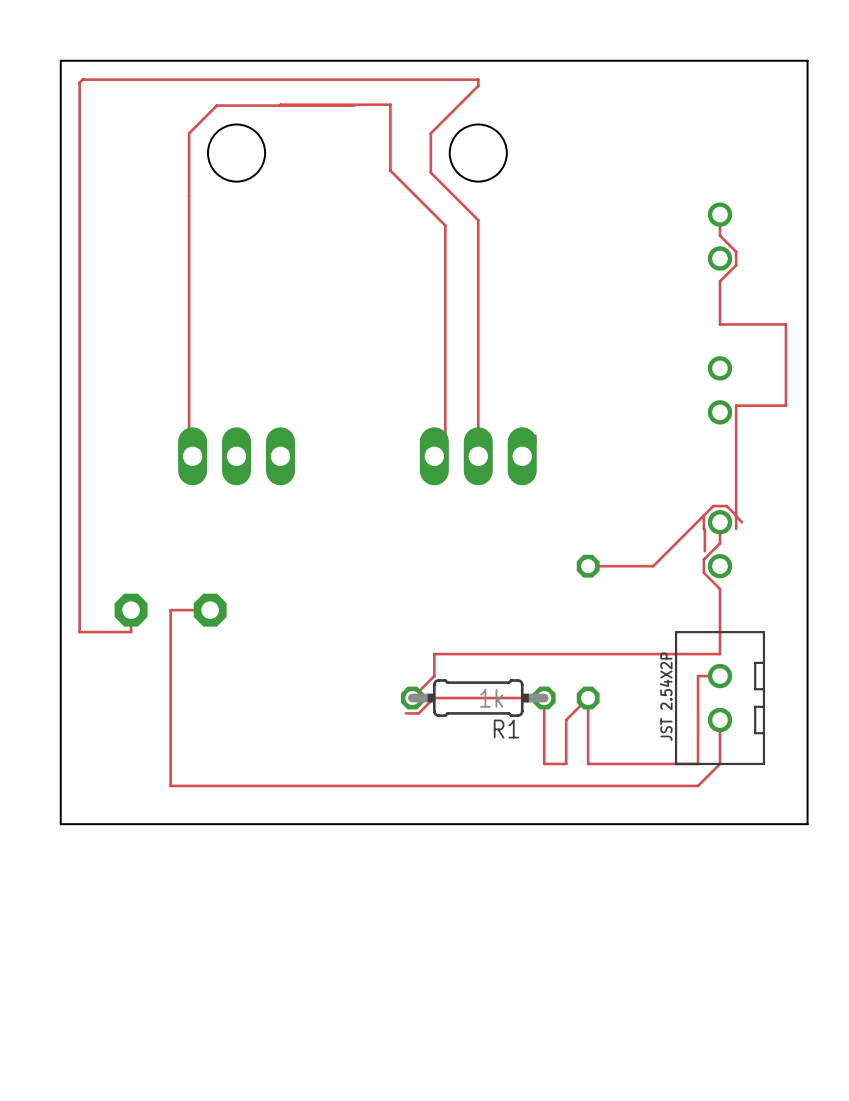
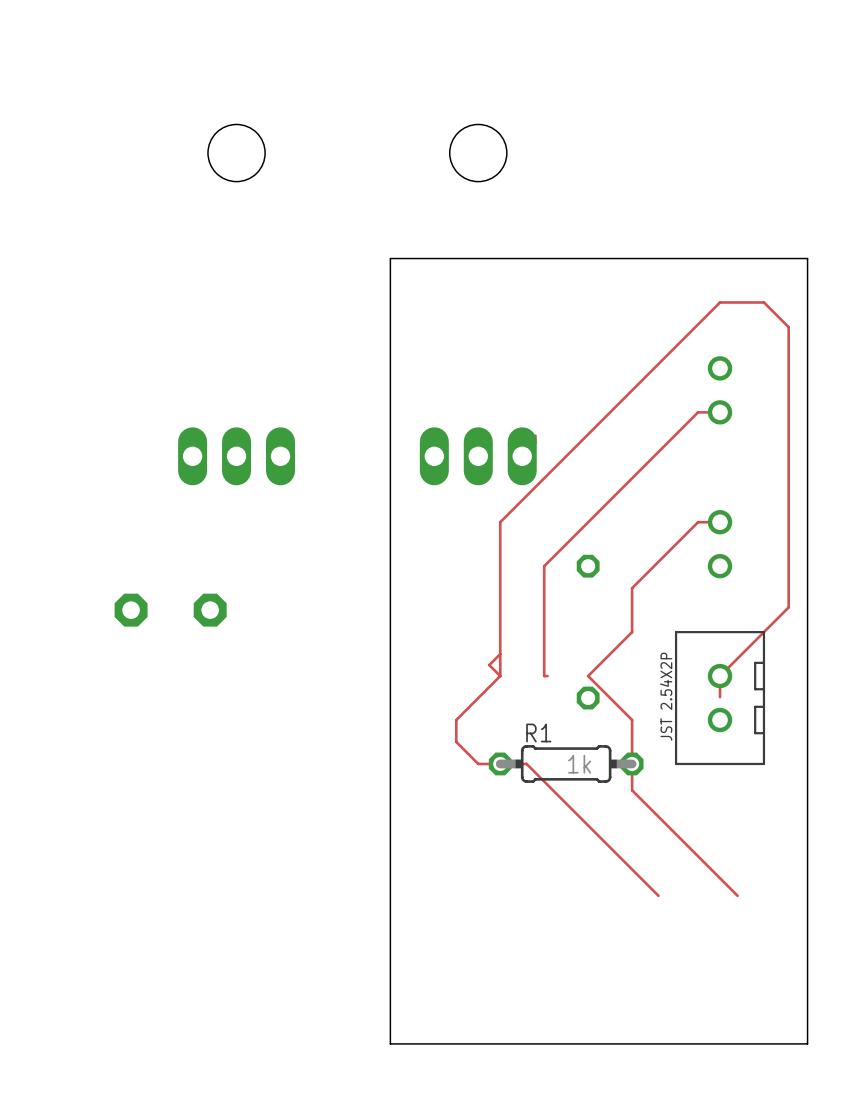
top track: (279, 105) (390, 104) (390, 170) (445, 225) (445, 445) (434, 456) -> none
top track: (354, 105) (216, 105) (189, 133) (189, 456) -> none
top track: (720, 214) (720, 235) (736, 251) (736, 265) (720, 281) (720, 324) (785, 324) (785, 405) (736, 405) (736, 528) -> none
part: (720, 236) -> none
board edge: (807, 258) (807, 60) (60, 60) (60, 824) (807, 824) -> (807, 258) (390, 258) (390, 1043) (807, 1043) (807, 824)
top track: none -> (720, 412) (698, 412) (544, 566) (544, 676) (547, 676)
top track: (478, 456) (478, 220) (430, 172) (430, 133) (478, 85) (478, 79) (82, 79) (79, 82) (79, 632) (131, 632) (131, 610) -> none
top track: (703, 515) (704, 551) -> none
top track: (736, 515) (726, 506) (713, 506) (653, 566) (588, 566) -> none
top track: (736, 516) (741, 522) -> none
top track: (720, 522) (720, 543) (703, 559) (703, 572) (720, 589) (720, 654) (434, 654) (434, 676) (412, 698) -> (720, 522) (698, 522) (632, 588) (632, 632) (588, 676) (632, 720) (632, 790) (737, 895)
top track: (210, 610) (170, 610) (170, 785) (698, 785) (720, 763) (720, 720) -> none
top track: none -> (500, 654) (489, 665) (500, 676)
top track: none -> (500, 676) (456, 720) (456, 741) (478, 763) (526, 763) (658, 895)
top track: none -> (500, 676) (500, 522) (720, 302) (763, 302) (788, 327) (788, 607) (720, 676) (720, 697)
top track: (720, 676) (698, 676) (698, 763) (588, 763) (588, 698) (566, 720) (566, 763) (544, 763) (544, 698) (434, 698) (418, 713) (405, 713) -> none
R1 position: (478, 698) -> (566, 763)
R1 name position: R1 (506, 729) -> R1 (538, 732)

